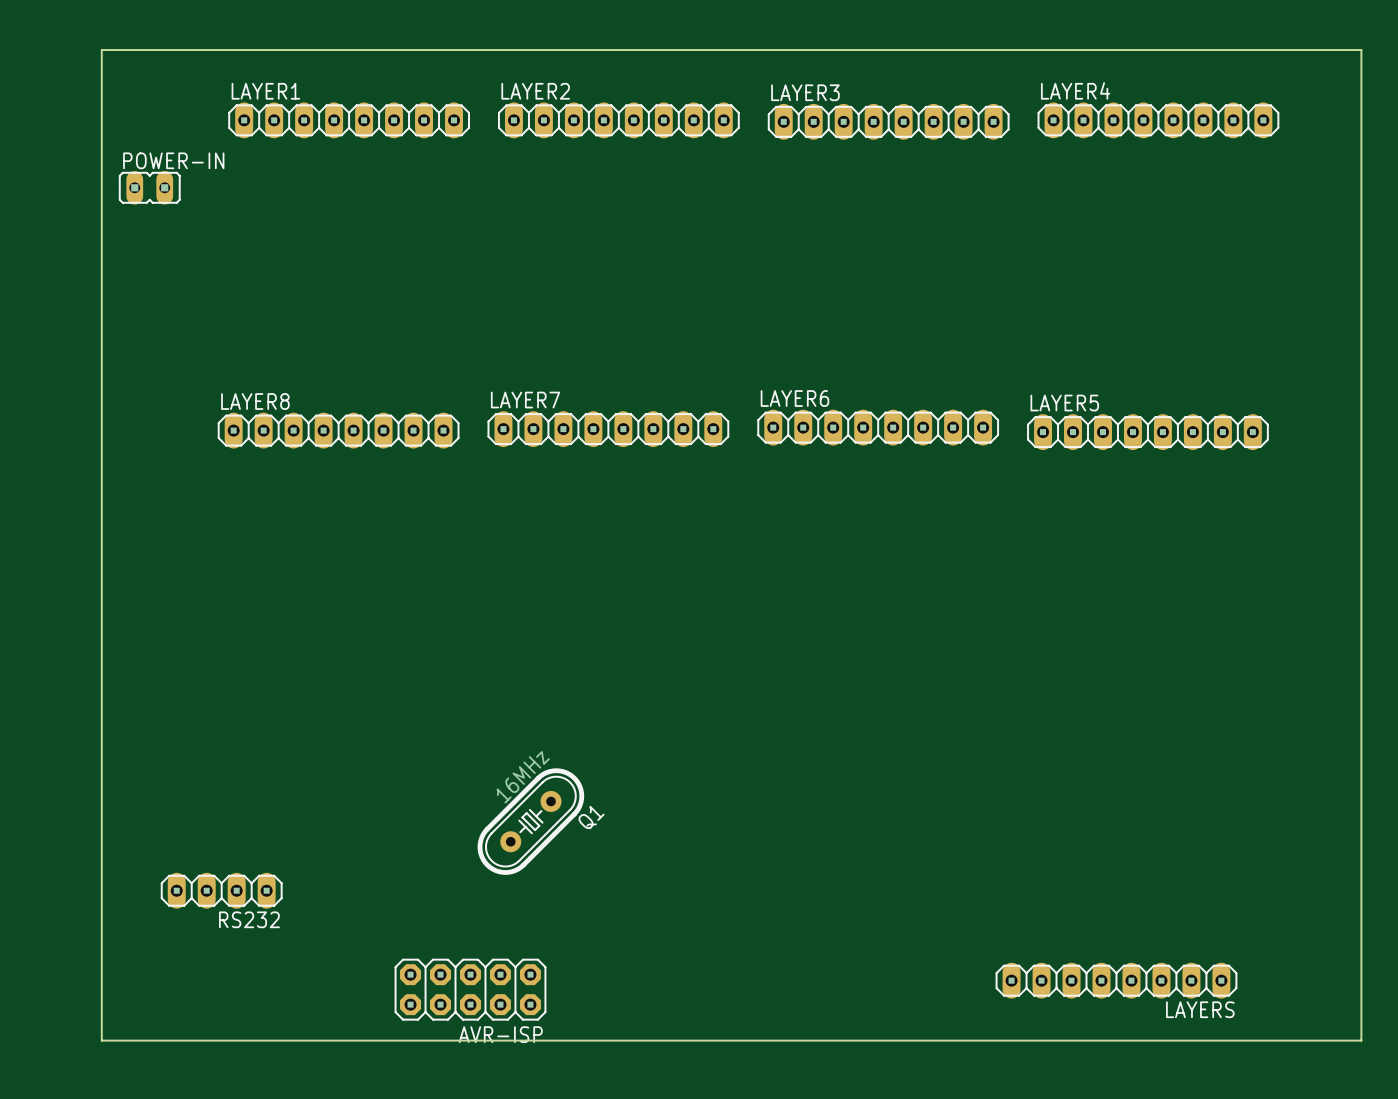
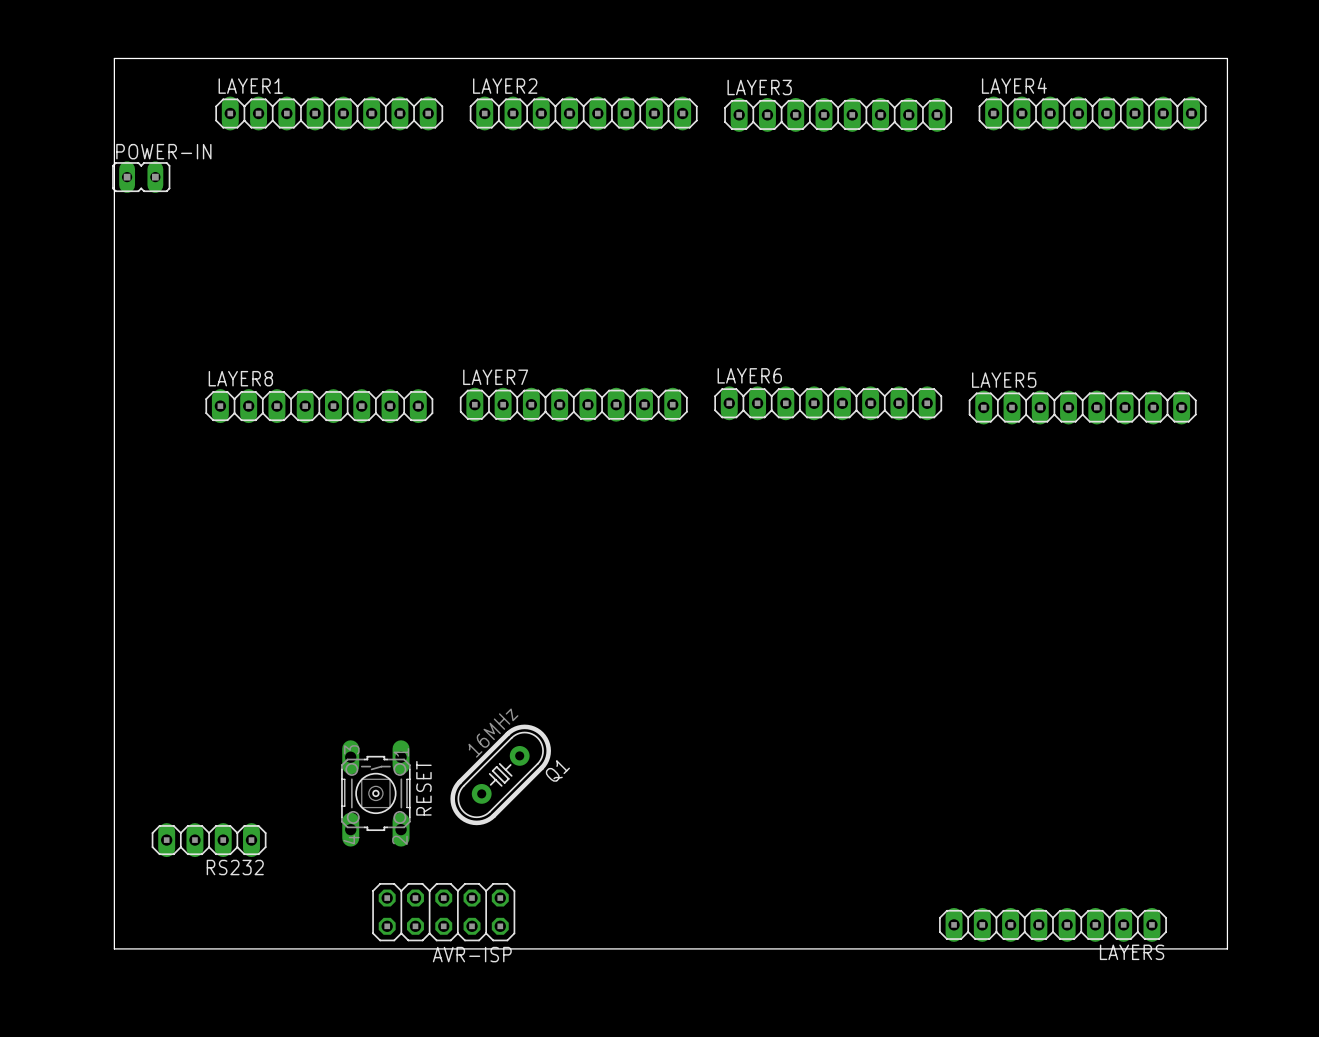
board edge: (101, 50) (1361, 50) (1361, 1040) (101, 1040) (101, 50) -> (114, 58) (114, 948) (1227, 948) (1227, 58) (114, 58)
RESET: none -> (375, 793)
AVR-ISP: none -> (443, 912)
AVR-ISP: (470, 989) -> none

